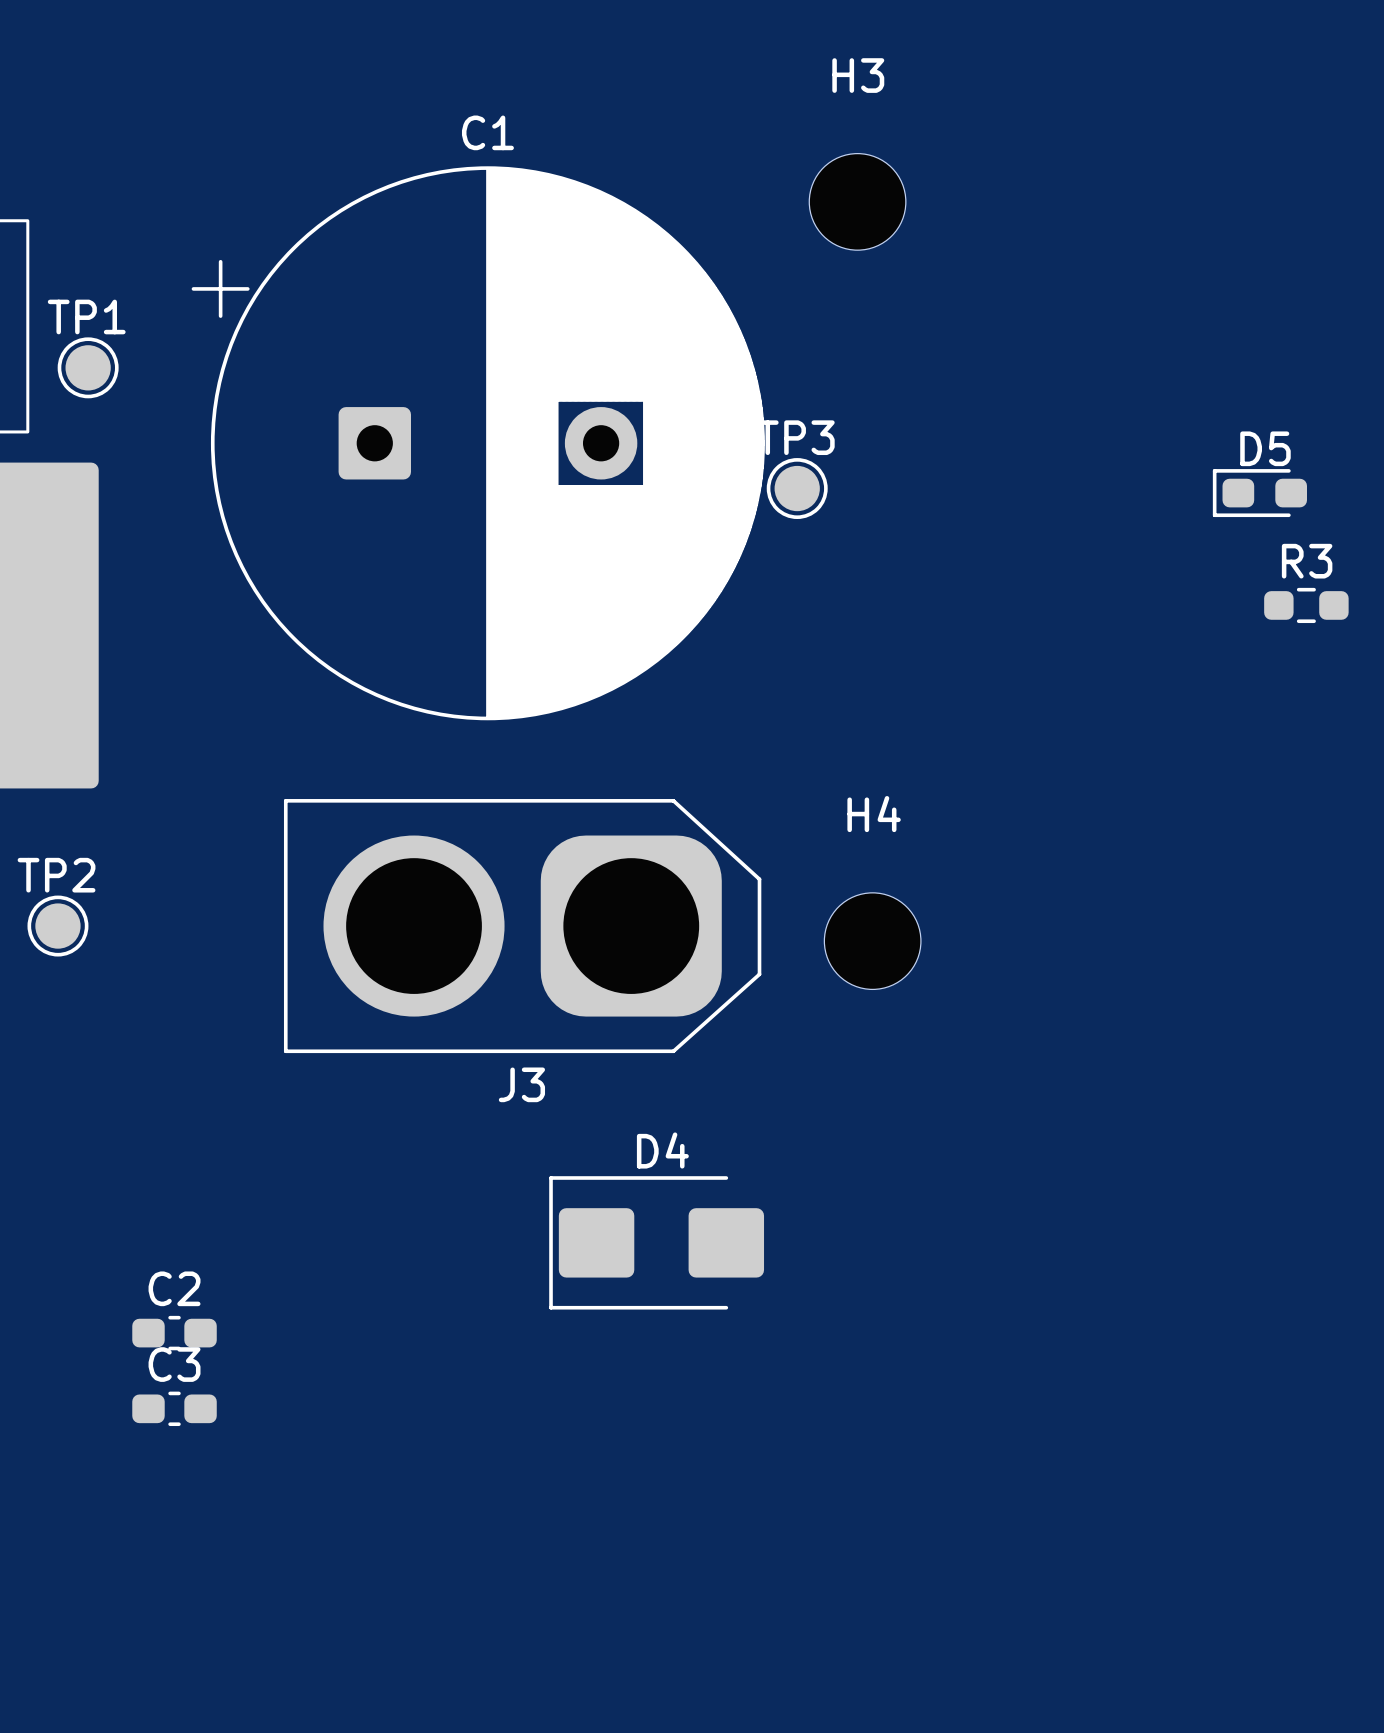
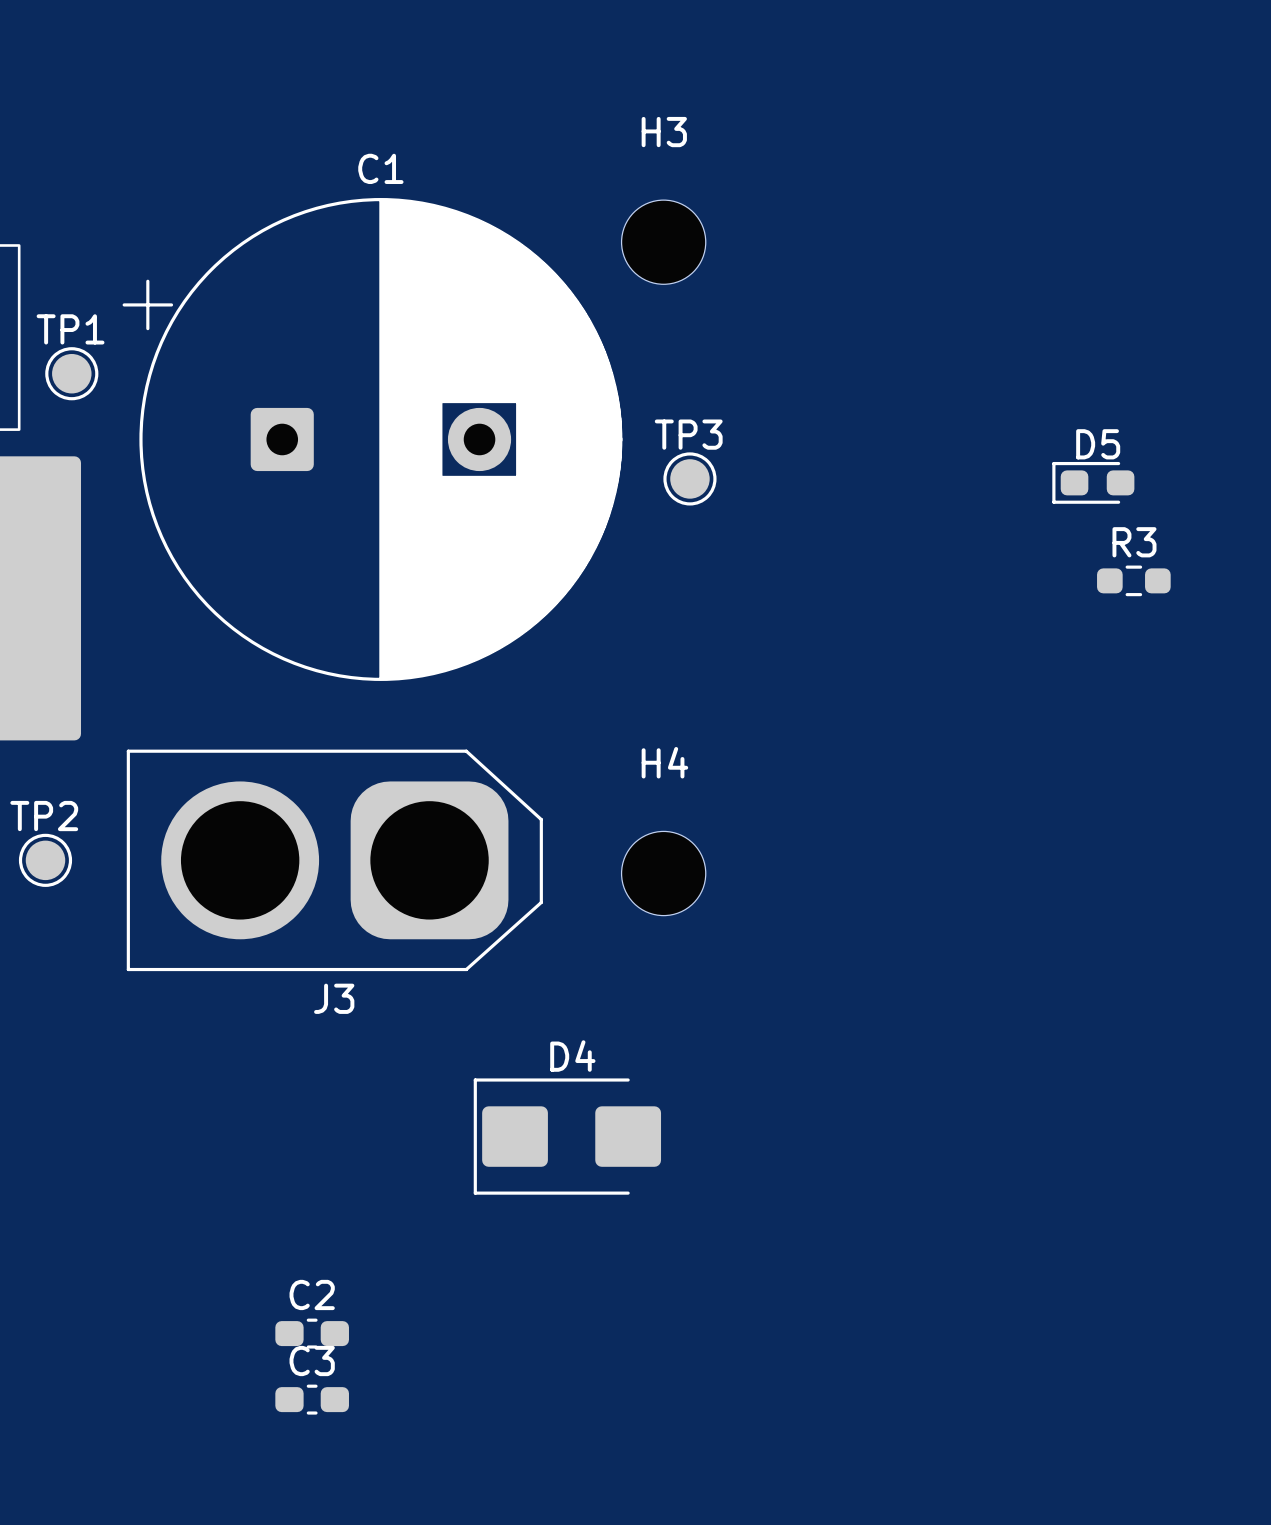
H3 position: (857, 201) -> (663, 242)
C1 position: (478, 443) -> (372, 439)
J3 position: (522, 926) -> (334, 860)
H4 position: (872, 941) -> (663, 873)
C2 position: (174, 1333) -> (312, 1333)
C3 position: (174, 1408) -> (312, 1399)

